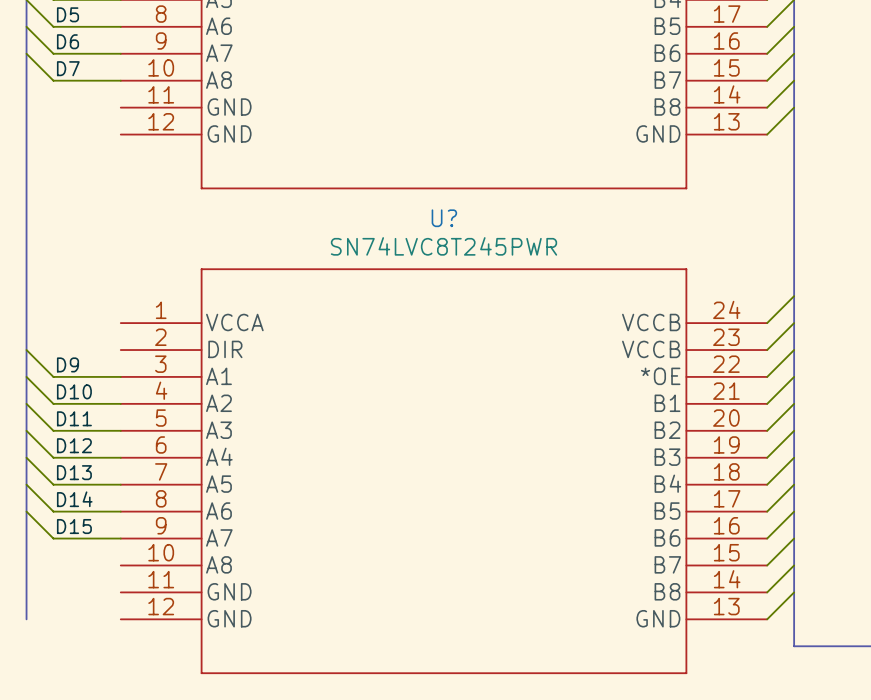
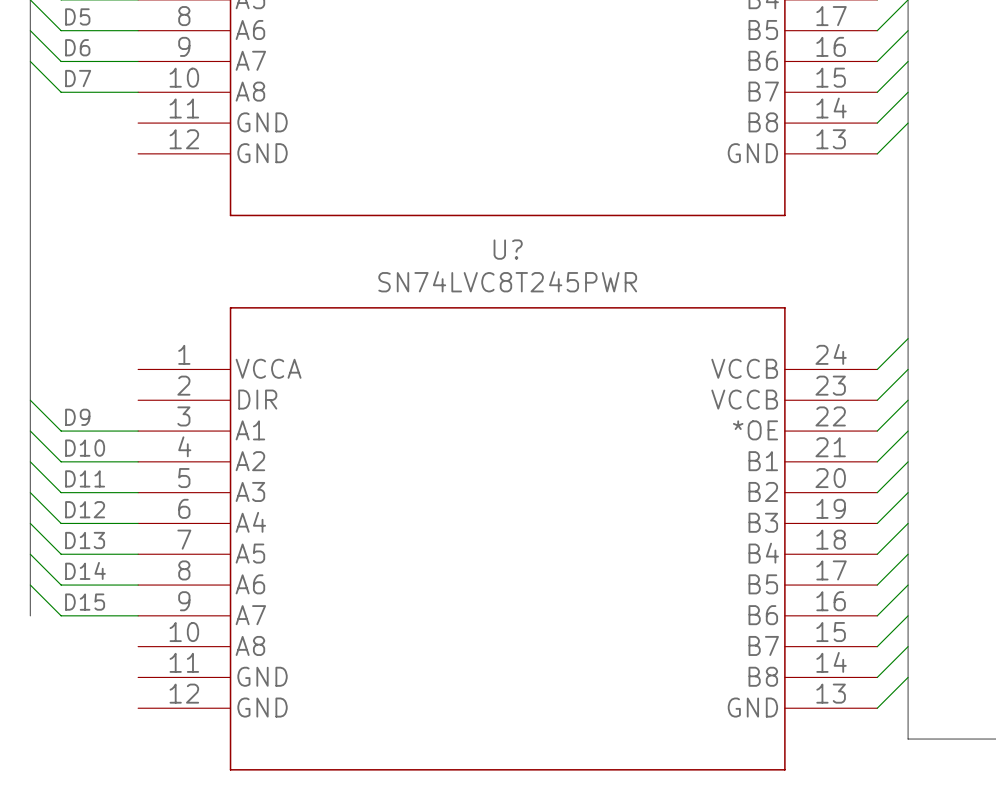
bus: (26, 538) (26, 619) -> none

